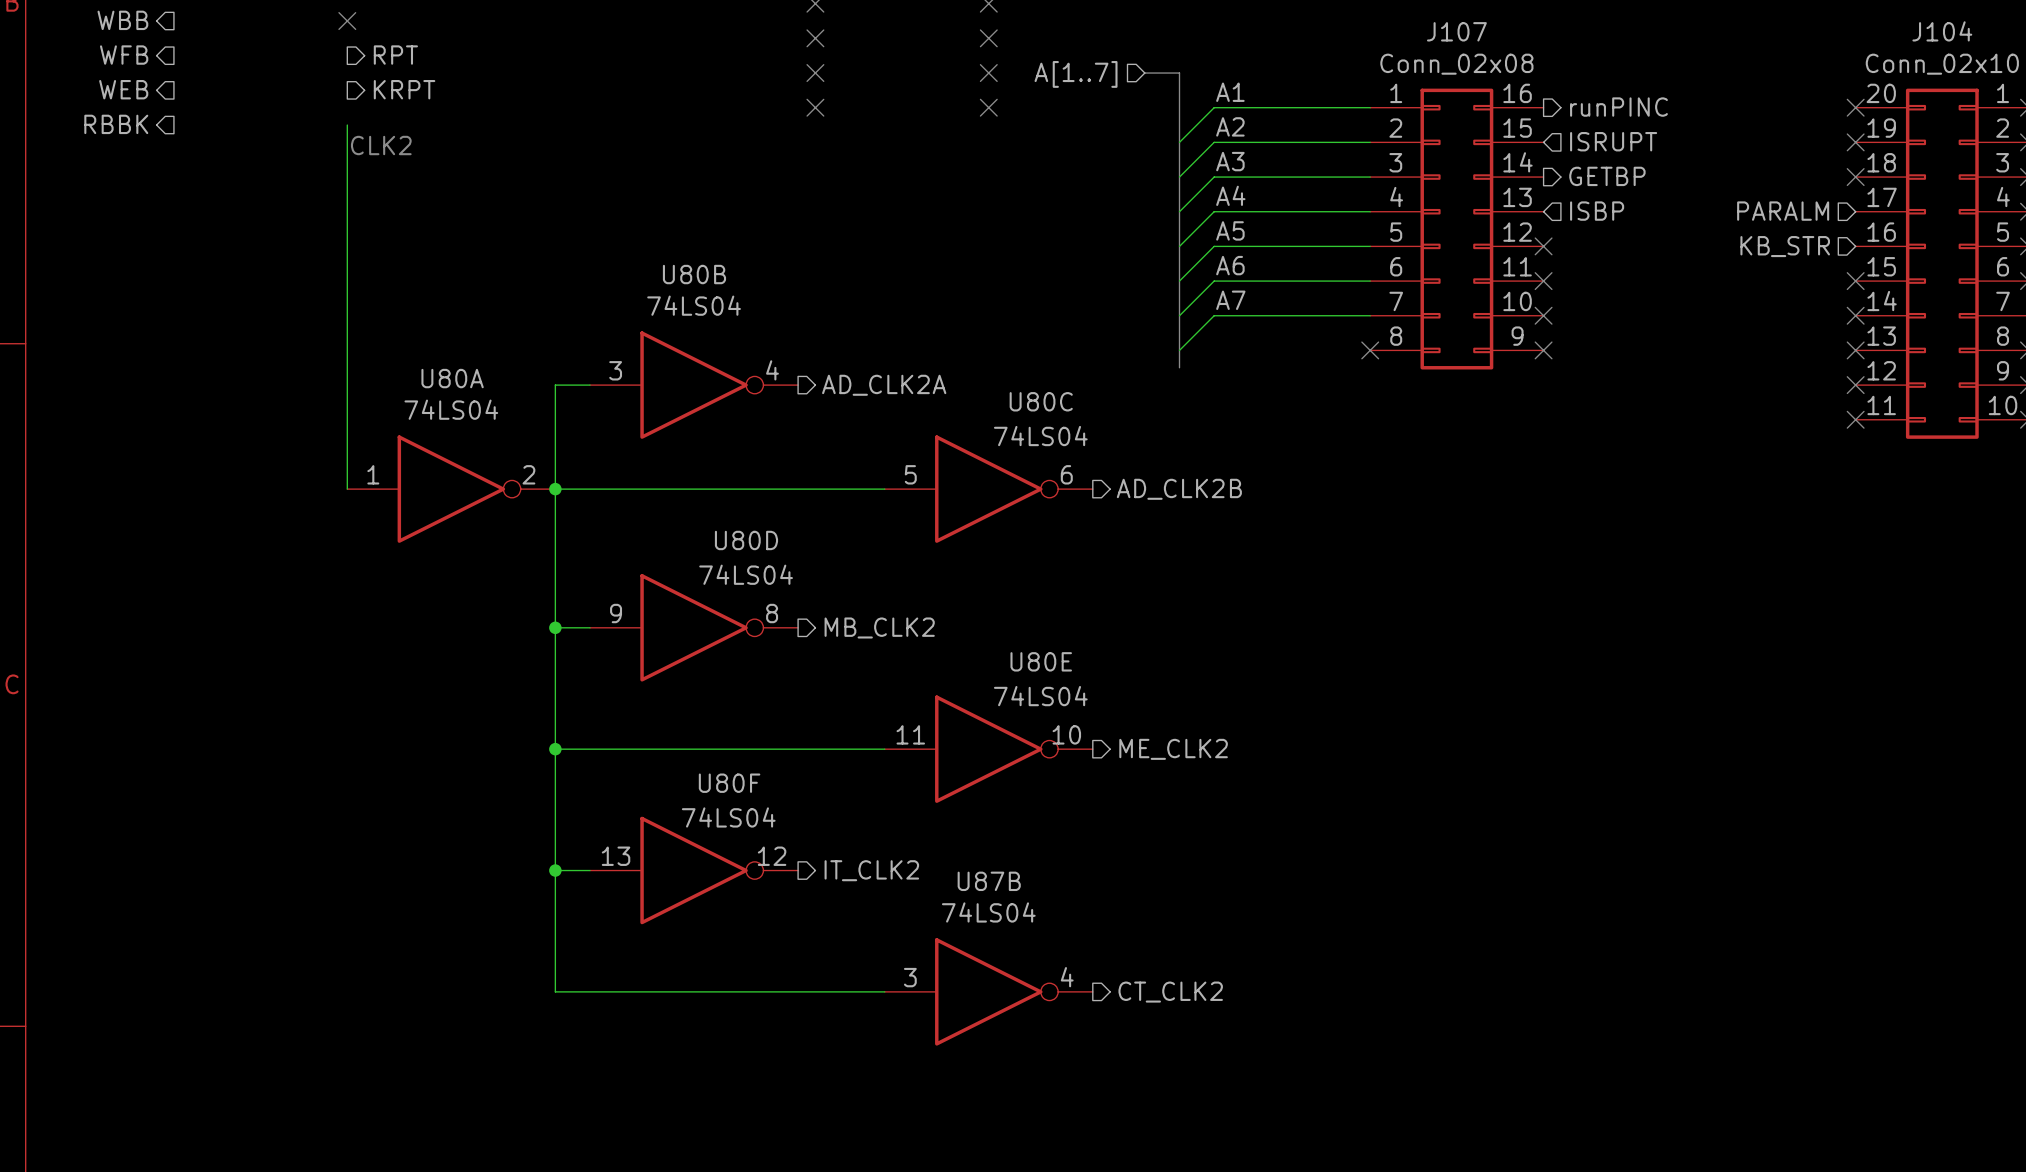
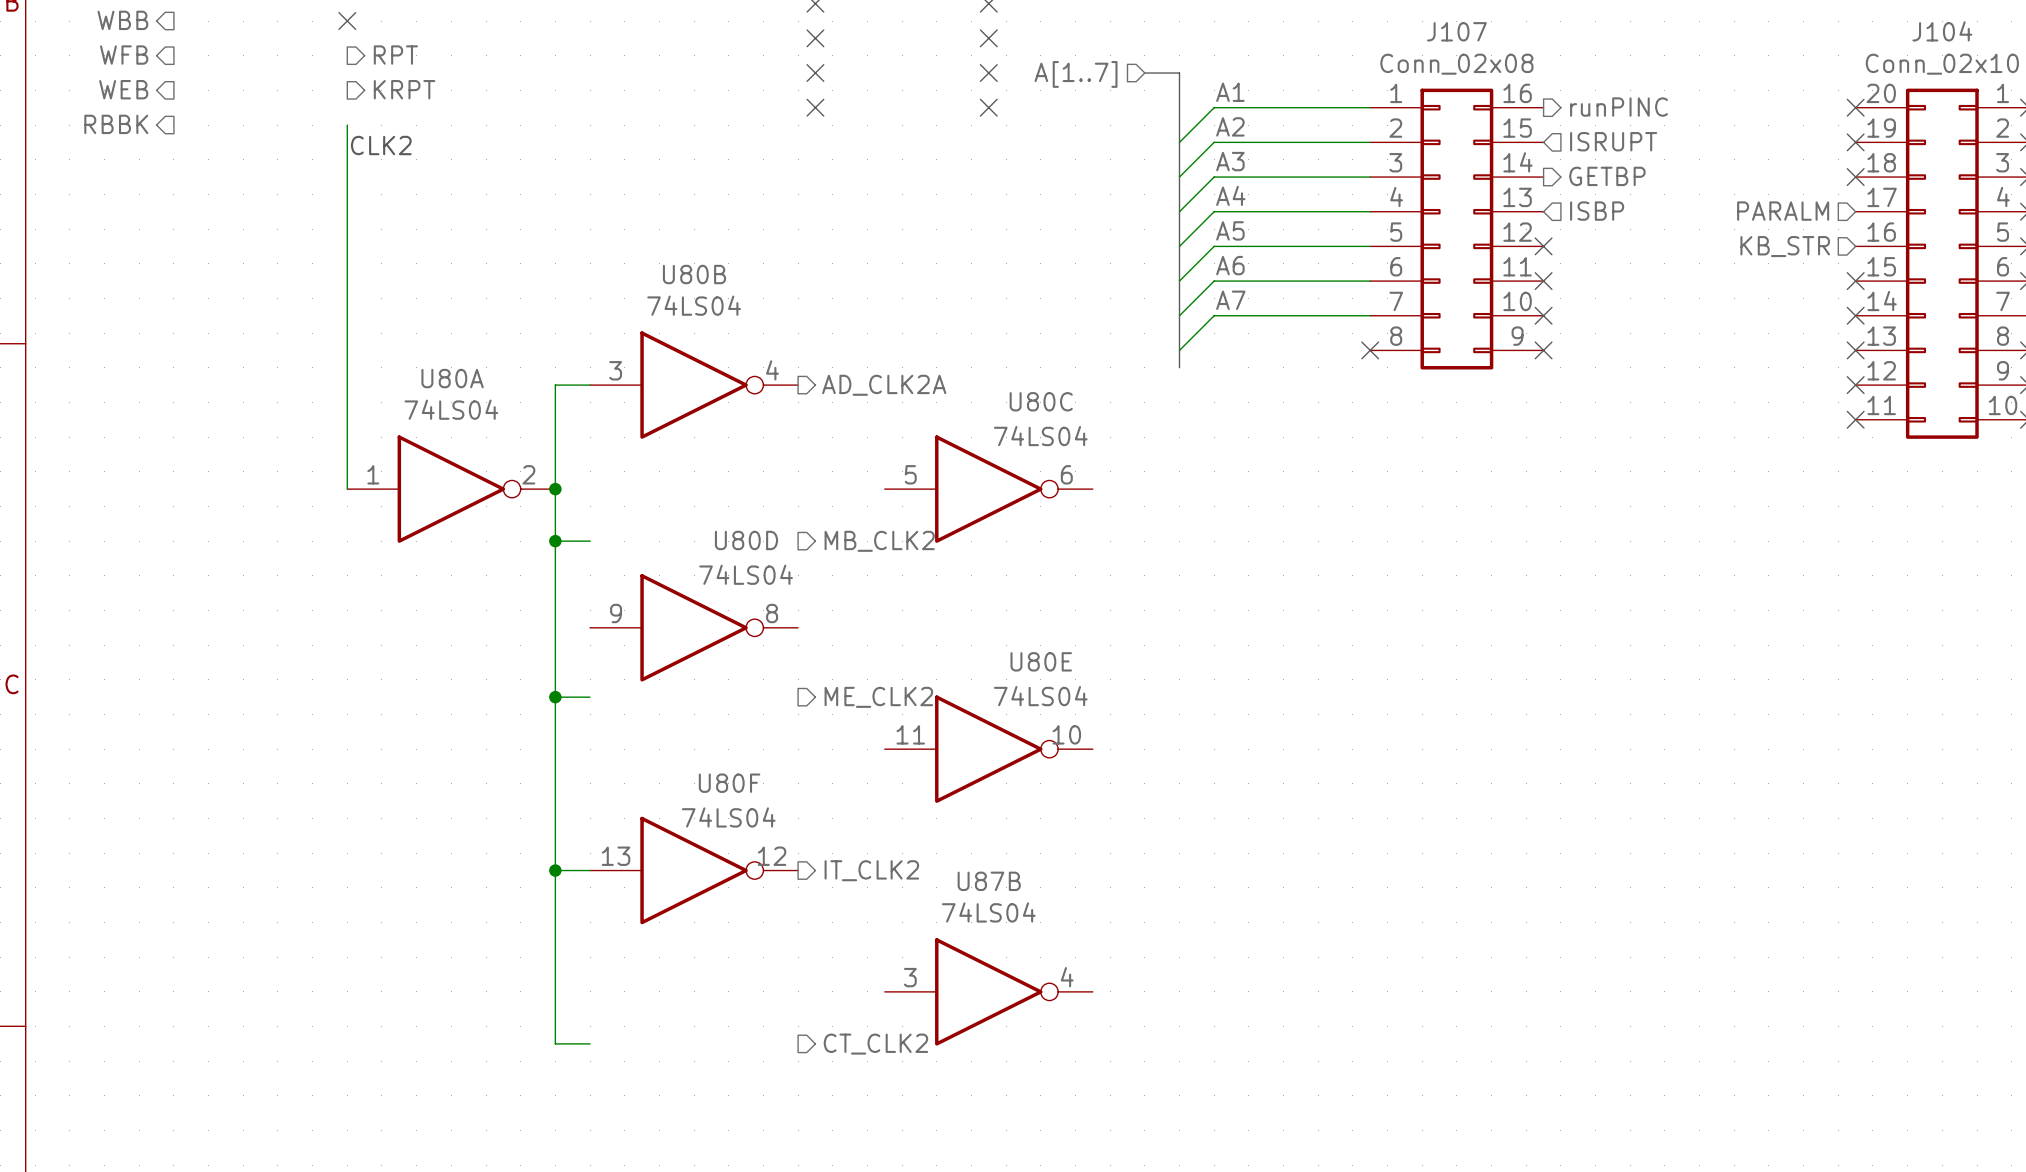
wire: (555, 489) (884, 489) -> none
hierarchical label: AD_CLK2B (1179, 489) -> none
wire: none -> (555, 541) (590, 541)
junction: none -> (555, 541)
wire: (555, 627) (590, 627) -> (555, 697) (590, 697)
junction: (555, 627) -> none
hierarchical label position: MB_CLK2 (879, 627) -> MB_CLK2 (879, 541)
junction: none -> (555, 697)
wire: (555, 749) (884, 749) -> none
junction: (555, 749) -> none
hierarchical label position: ME_CLK2 (1173, 749) -> ME_CLK2 (878, 697)
wire: (555, 991) (884, 991) -> (555, 991) (555, 1043) (590, 1043)
hierarchical label position: CT_CLK2 (1170, 992) -> CT_CLK2 (875, 1044)

